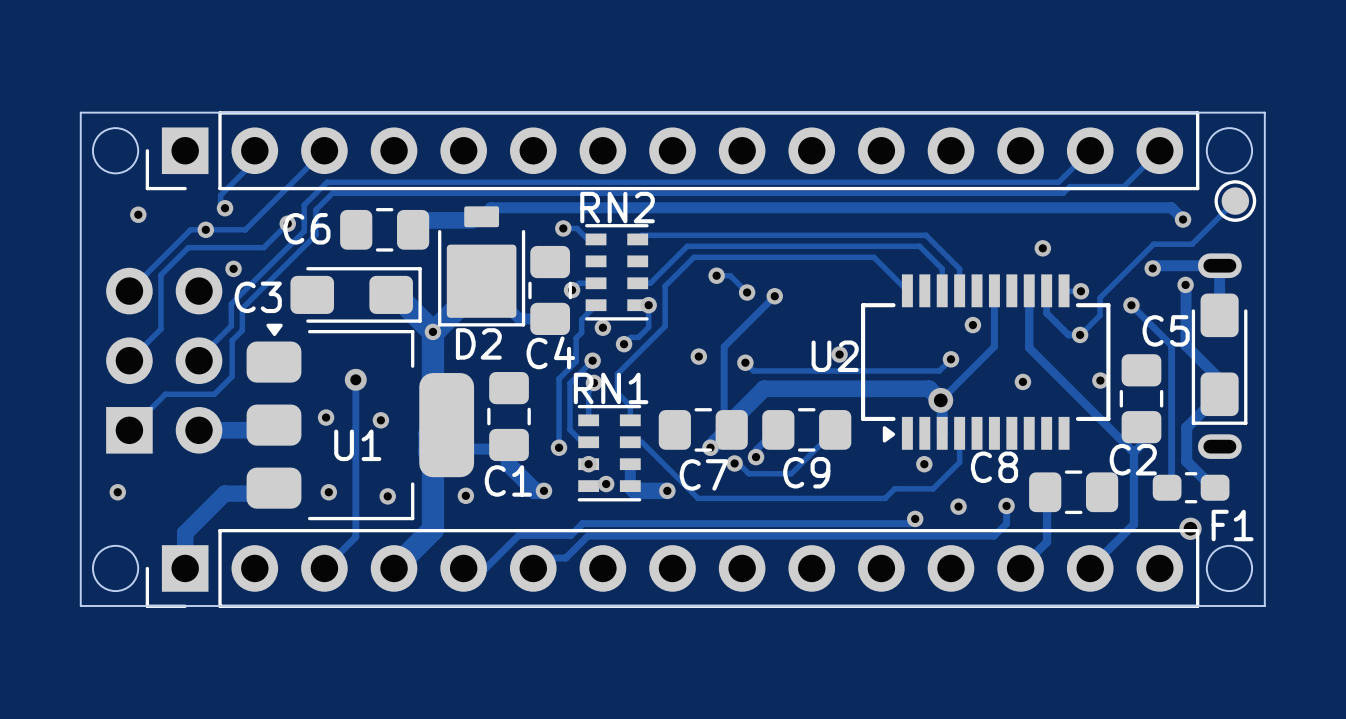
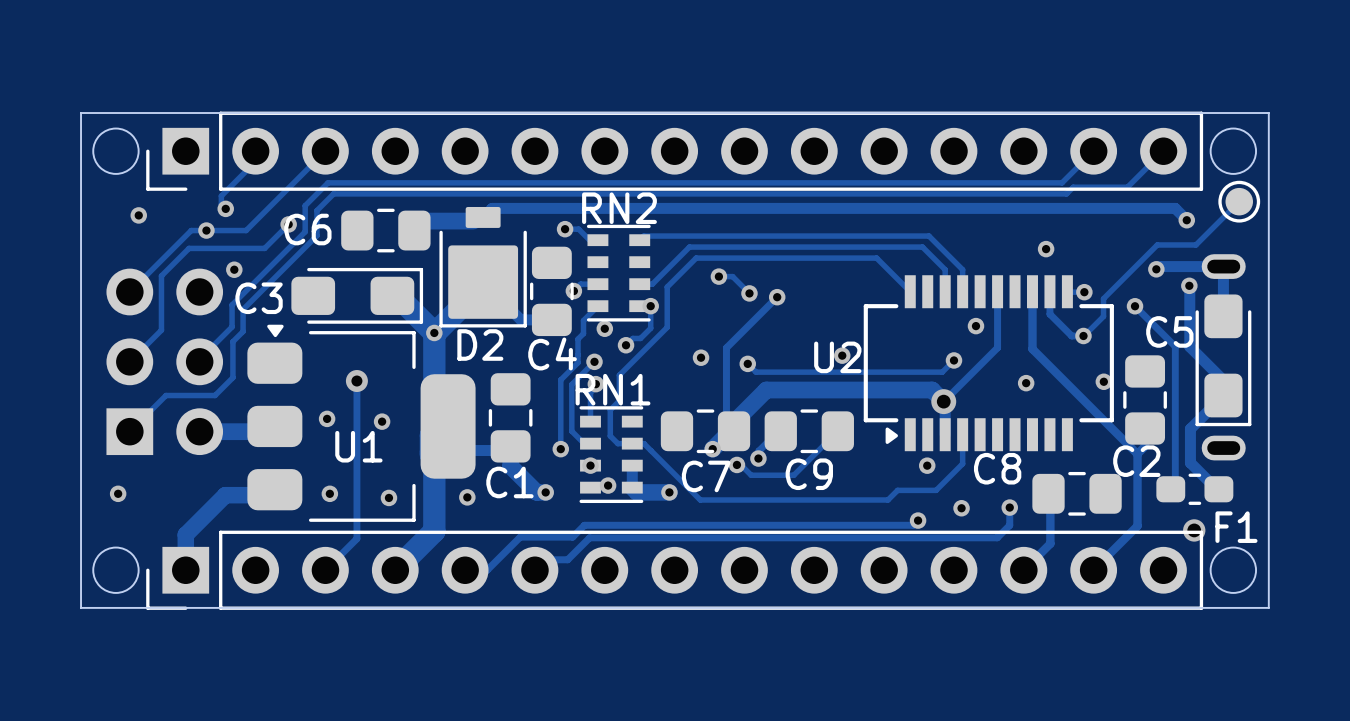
track: (617, 393) (630, 405) (630, 420) -> (619, 394) (619, 400) (610, 409) (610, 436) (617, 443) (632, 443)

